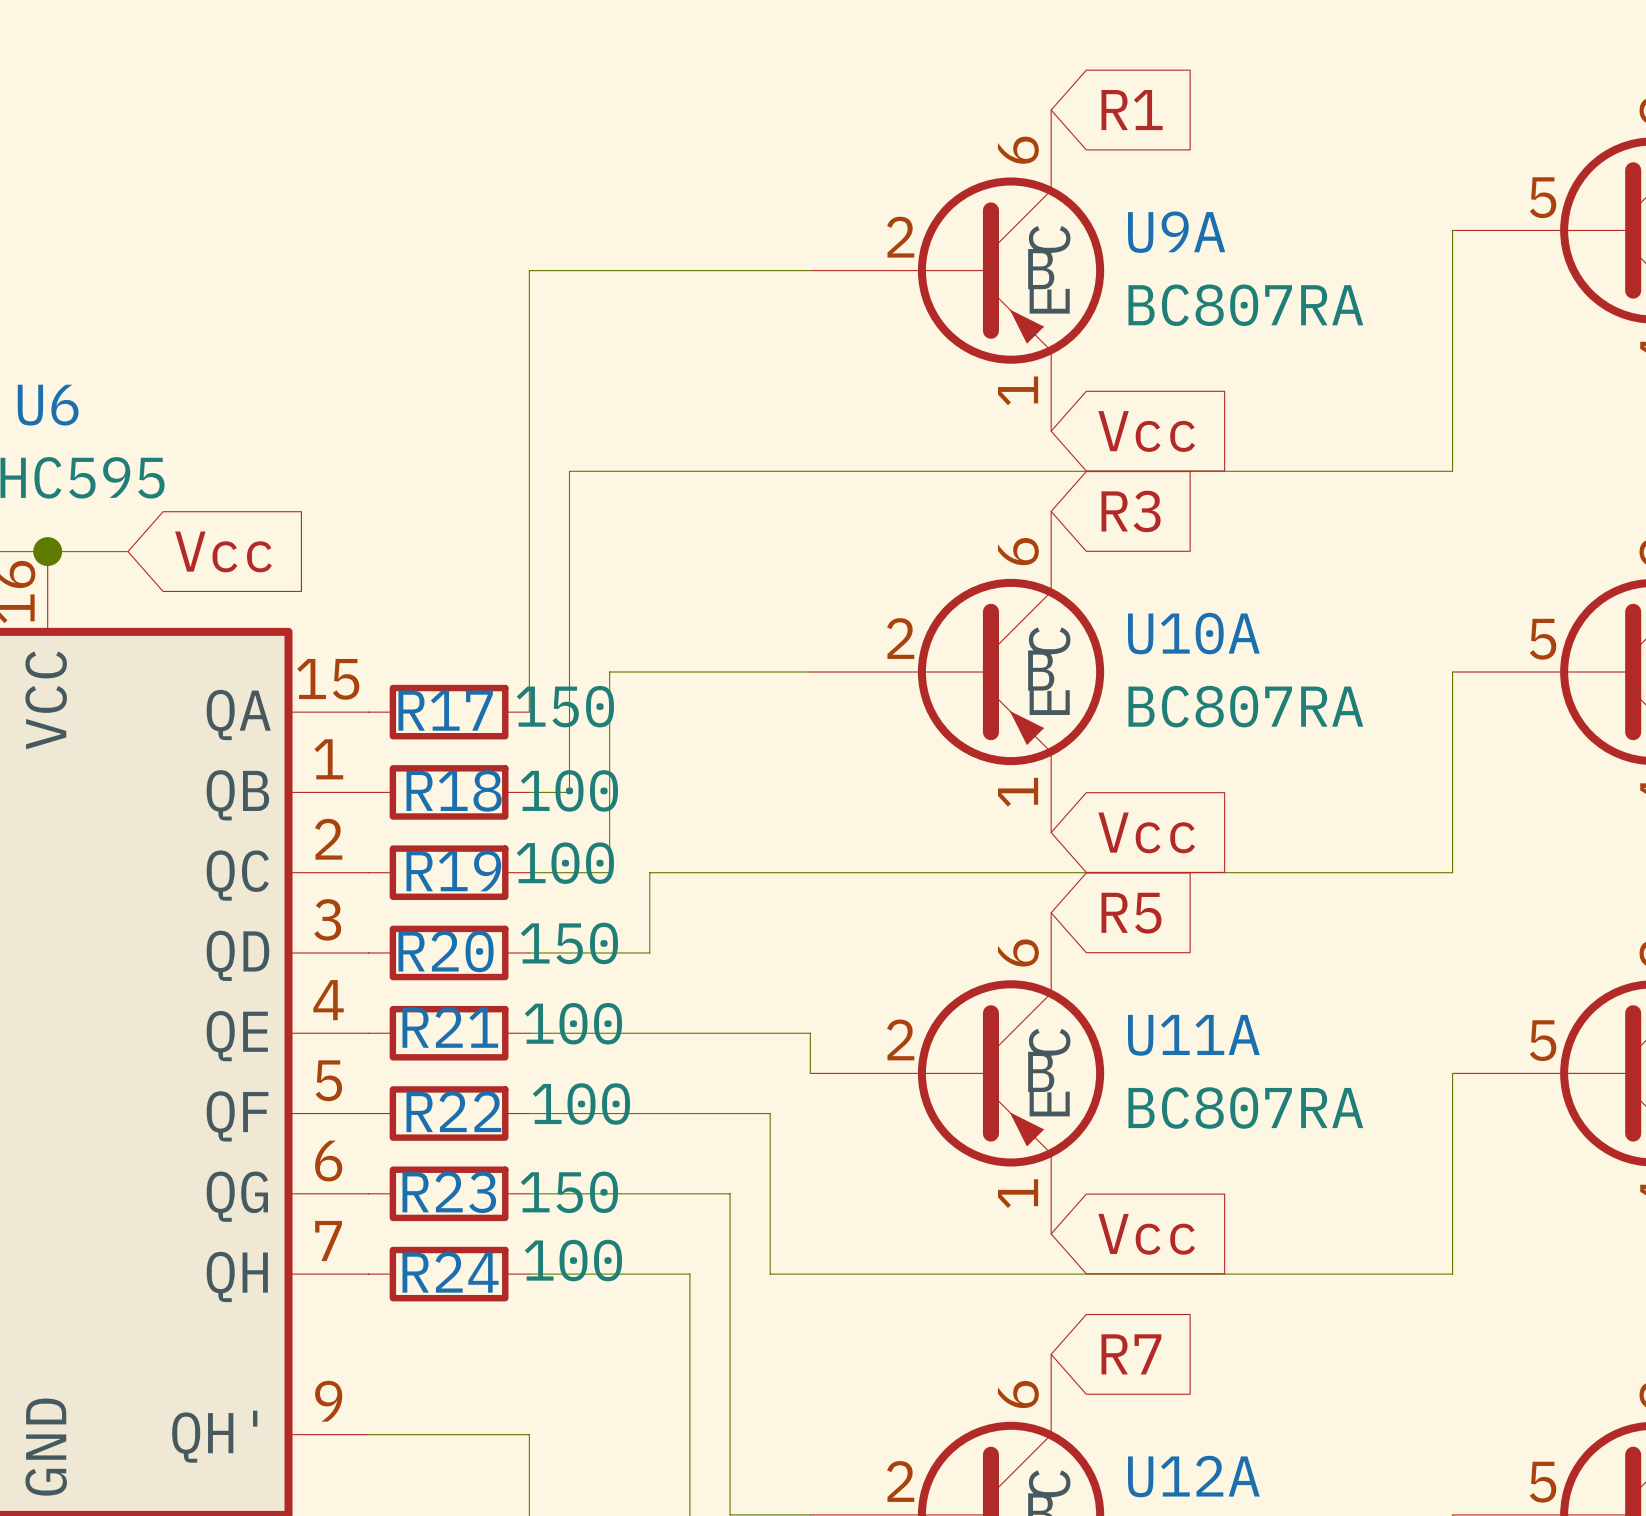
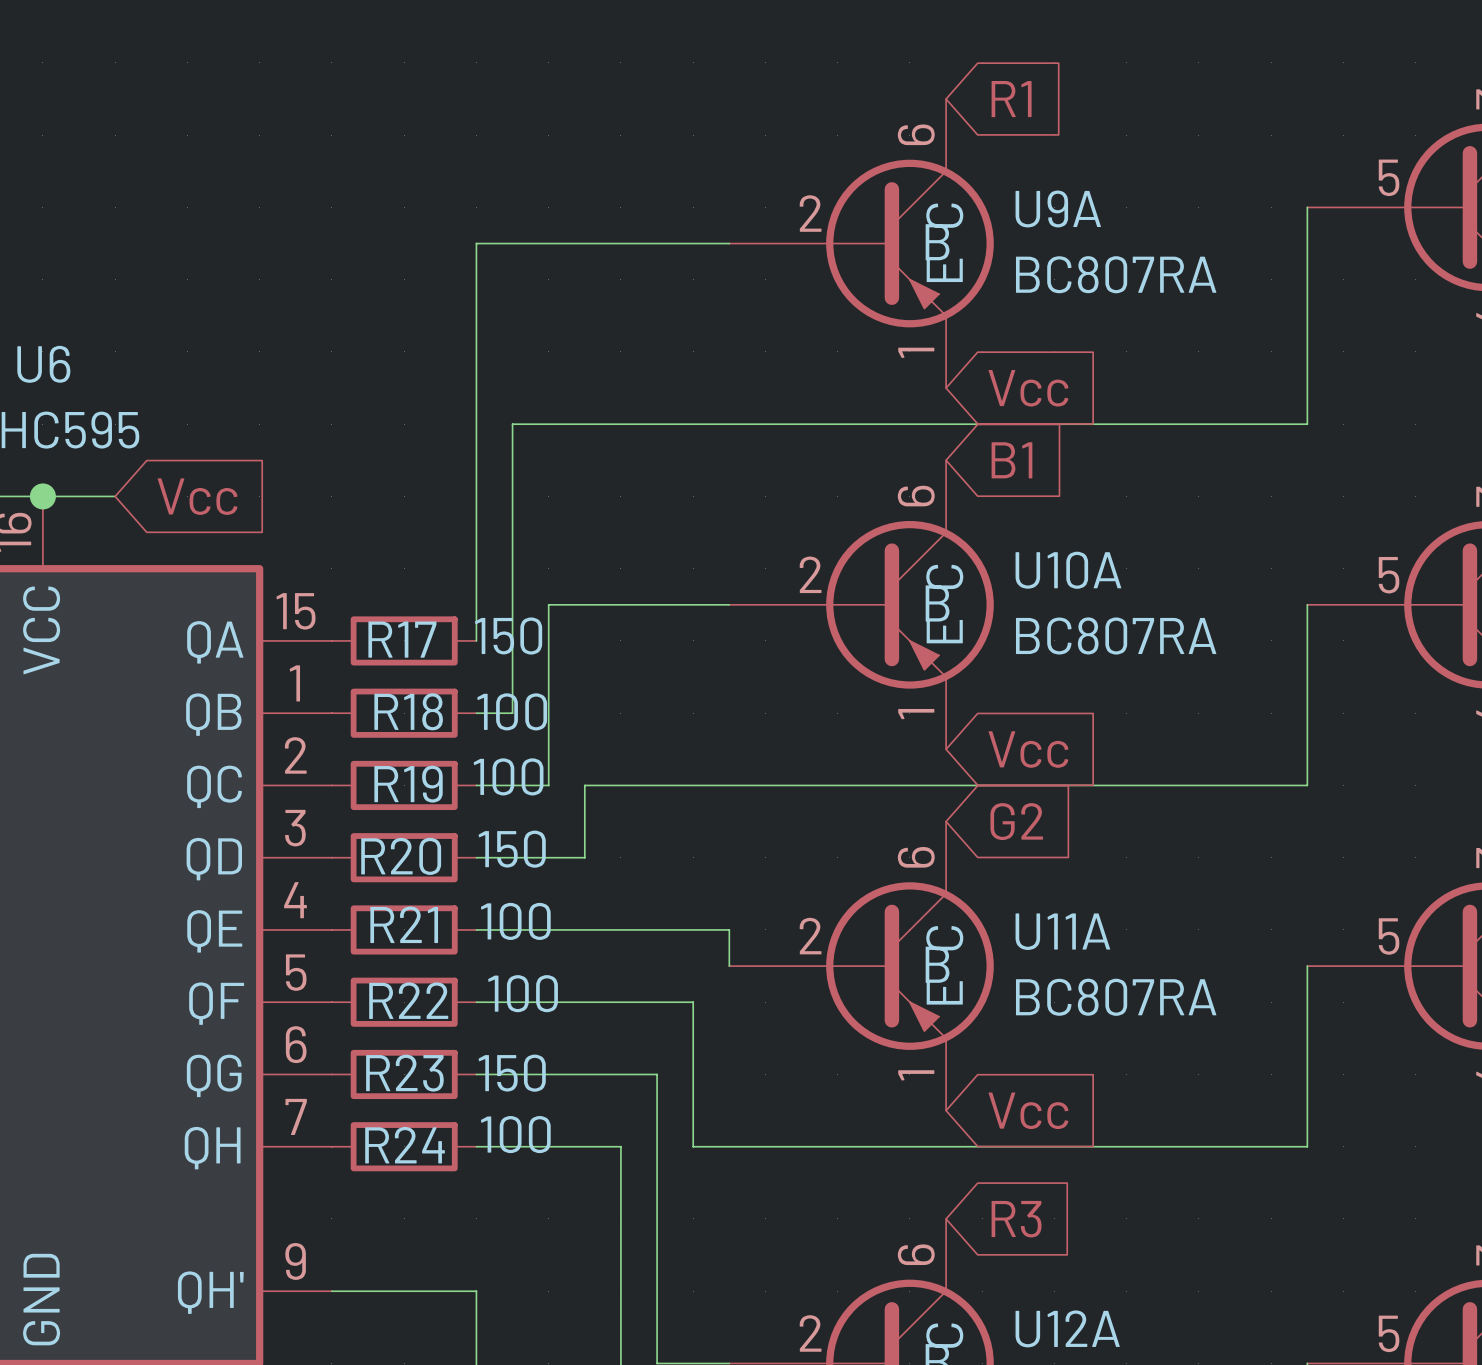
global label: R3 (1131, 511) -> B1 (1011, 460)
global label: R5 (1131, 913) -> G2 (1016, 821)
global label: R7 (1131, 1354) -> R3 (1016, 1219)

